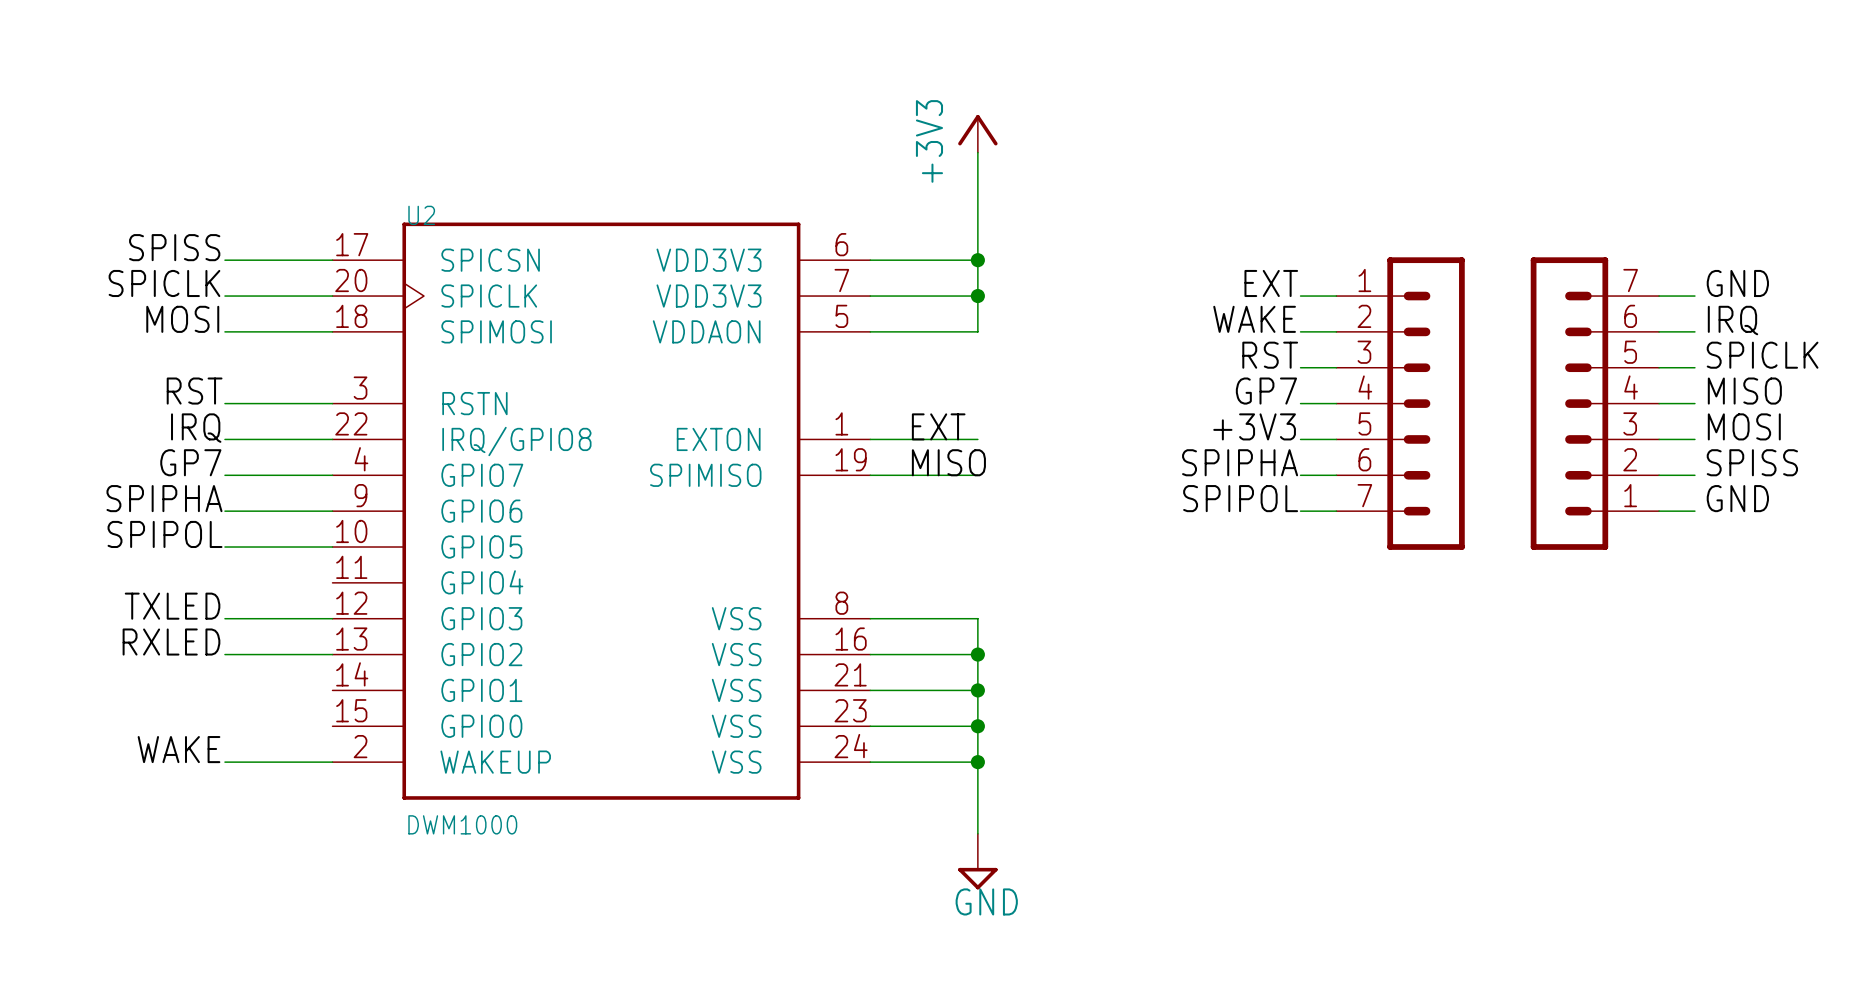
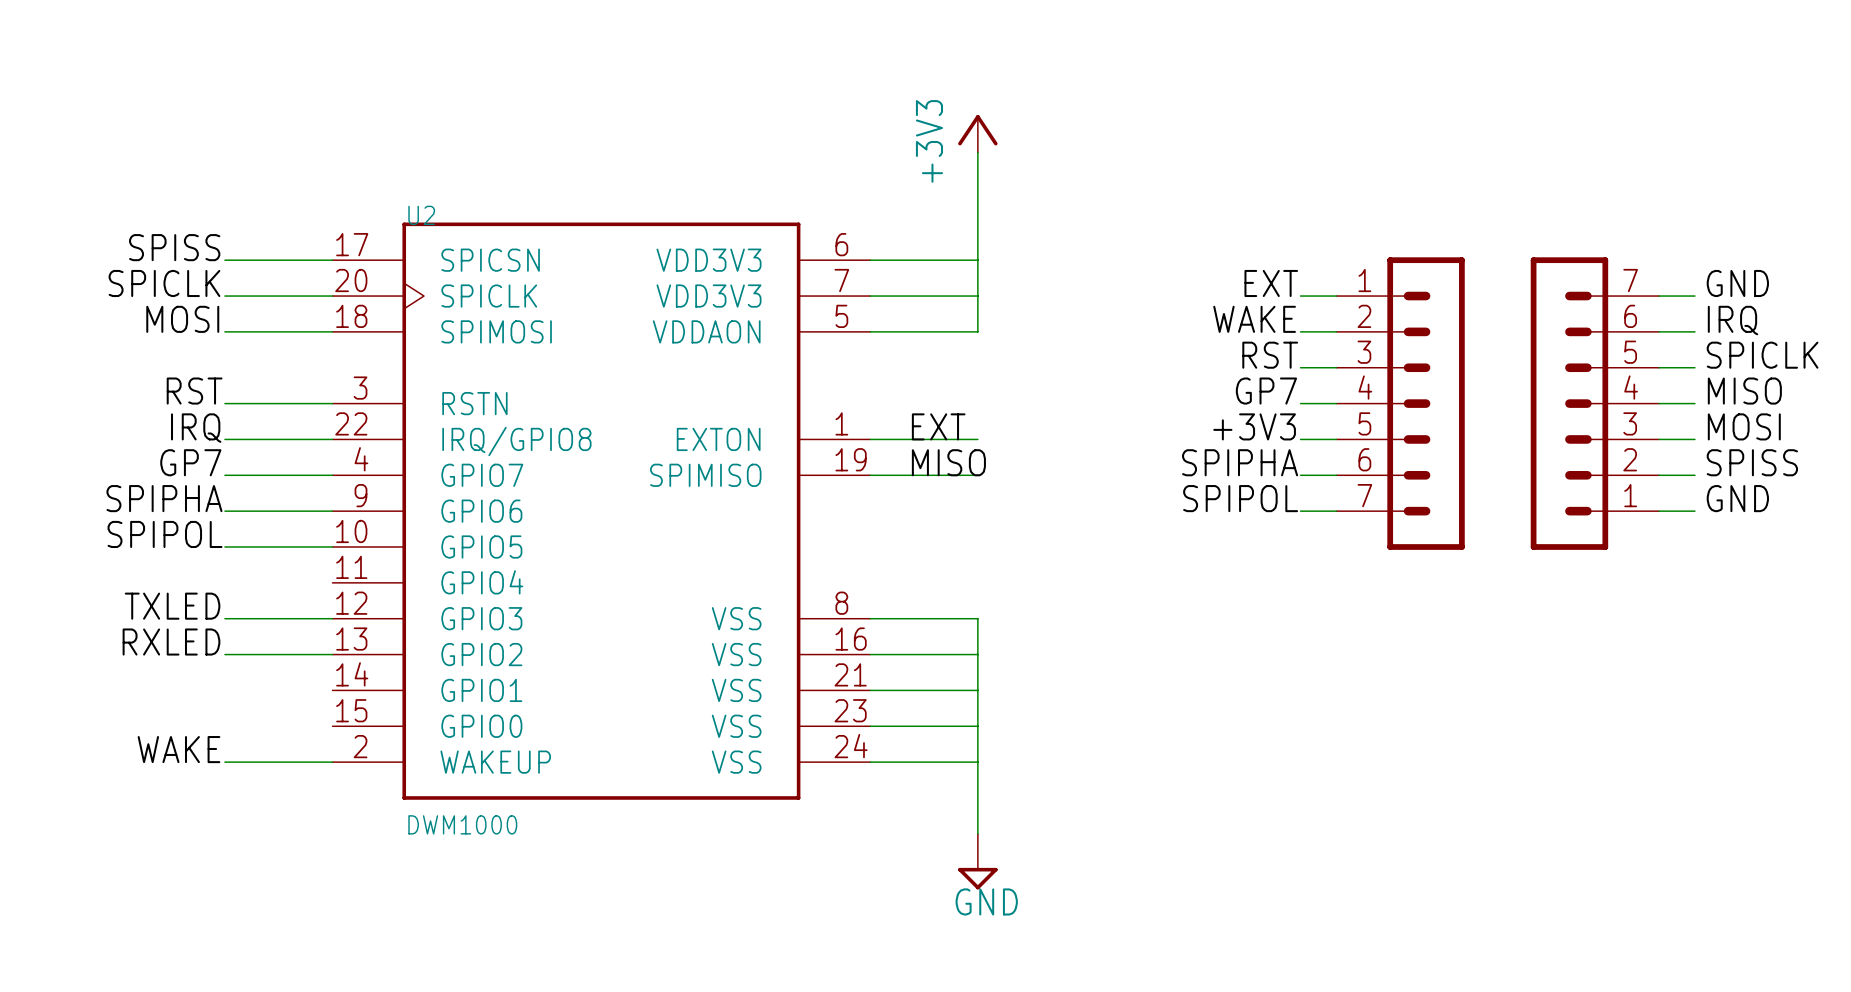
junction: (977, 260) -> none
junction: (977, 296) -> none
junction: (977, 654) -> none
junction: (977, 690) -> none
junction: (977, 726) -> none
junction: (977, 762) -> none

